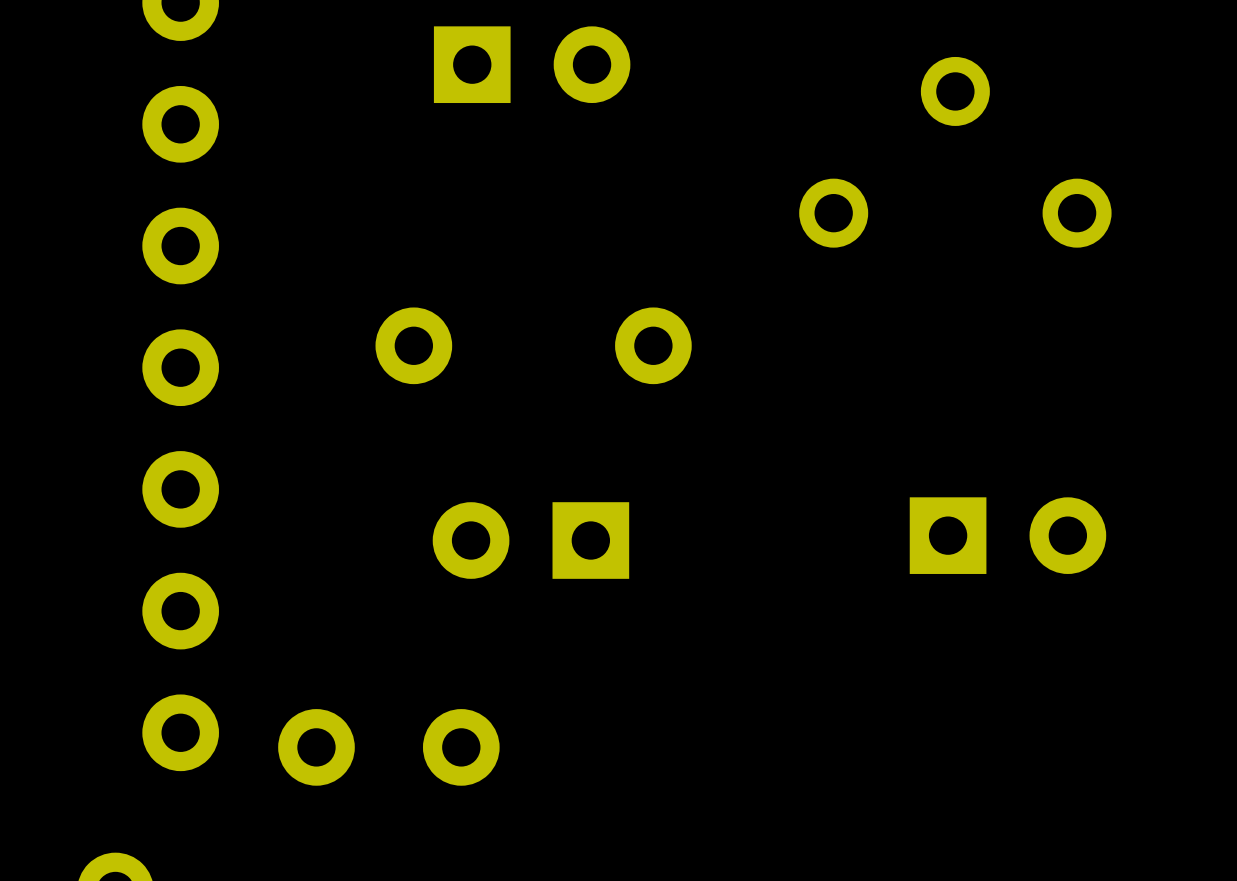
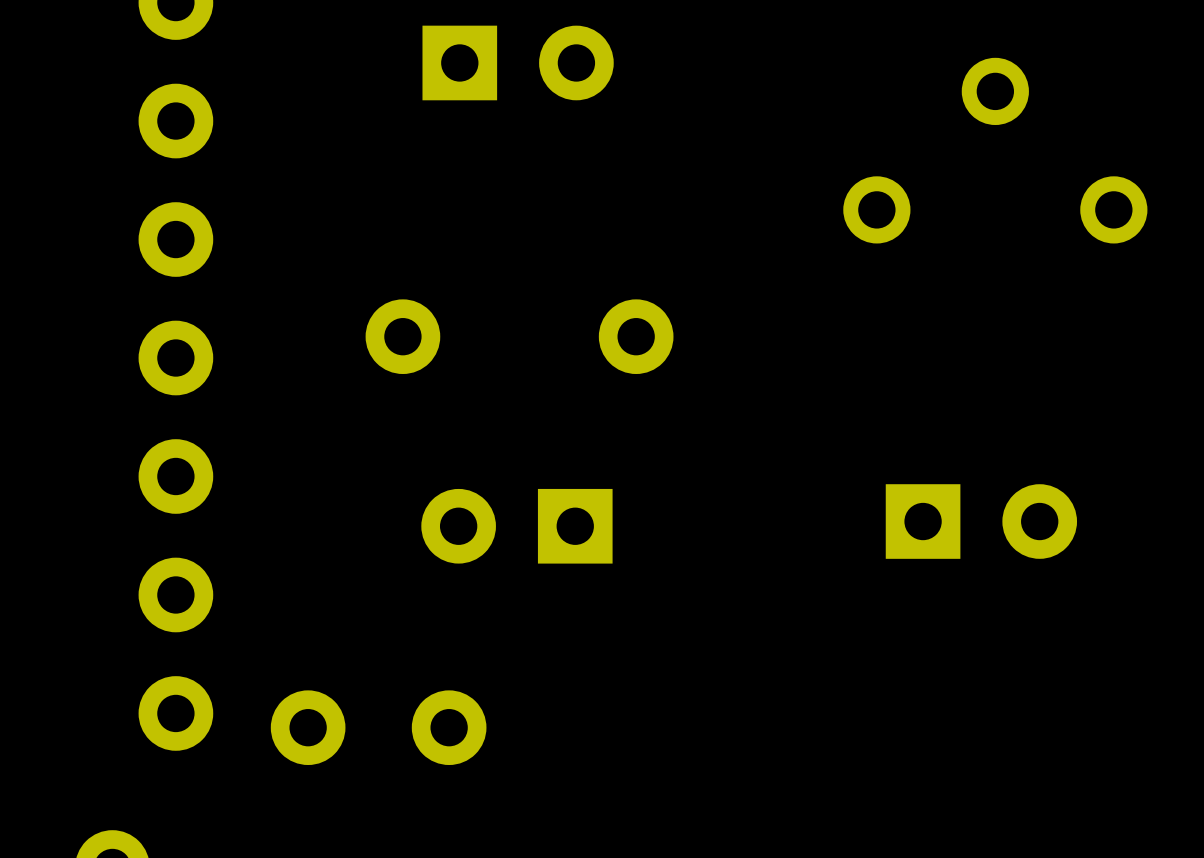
part position: (955, 152) -> (995, 150)

